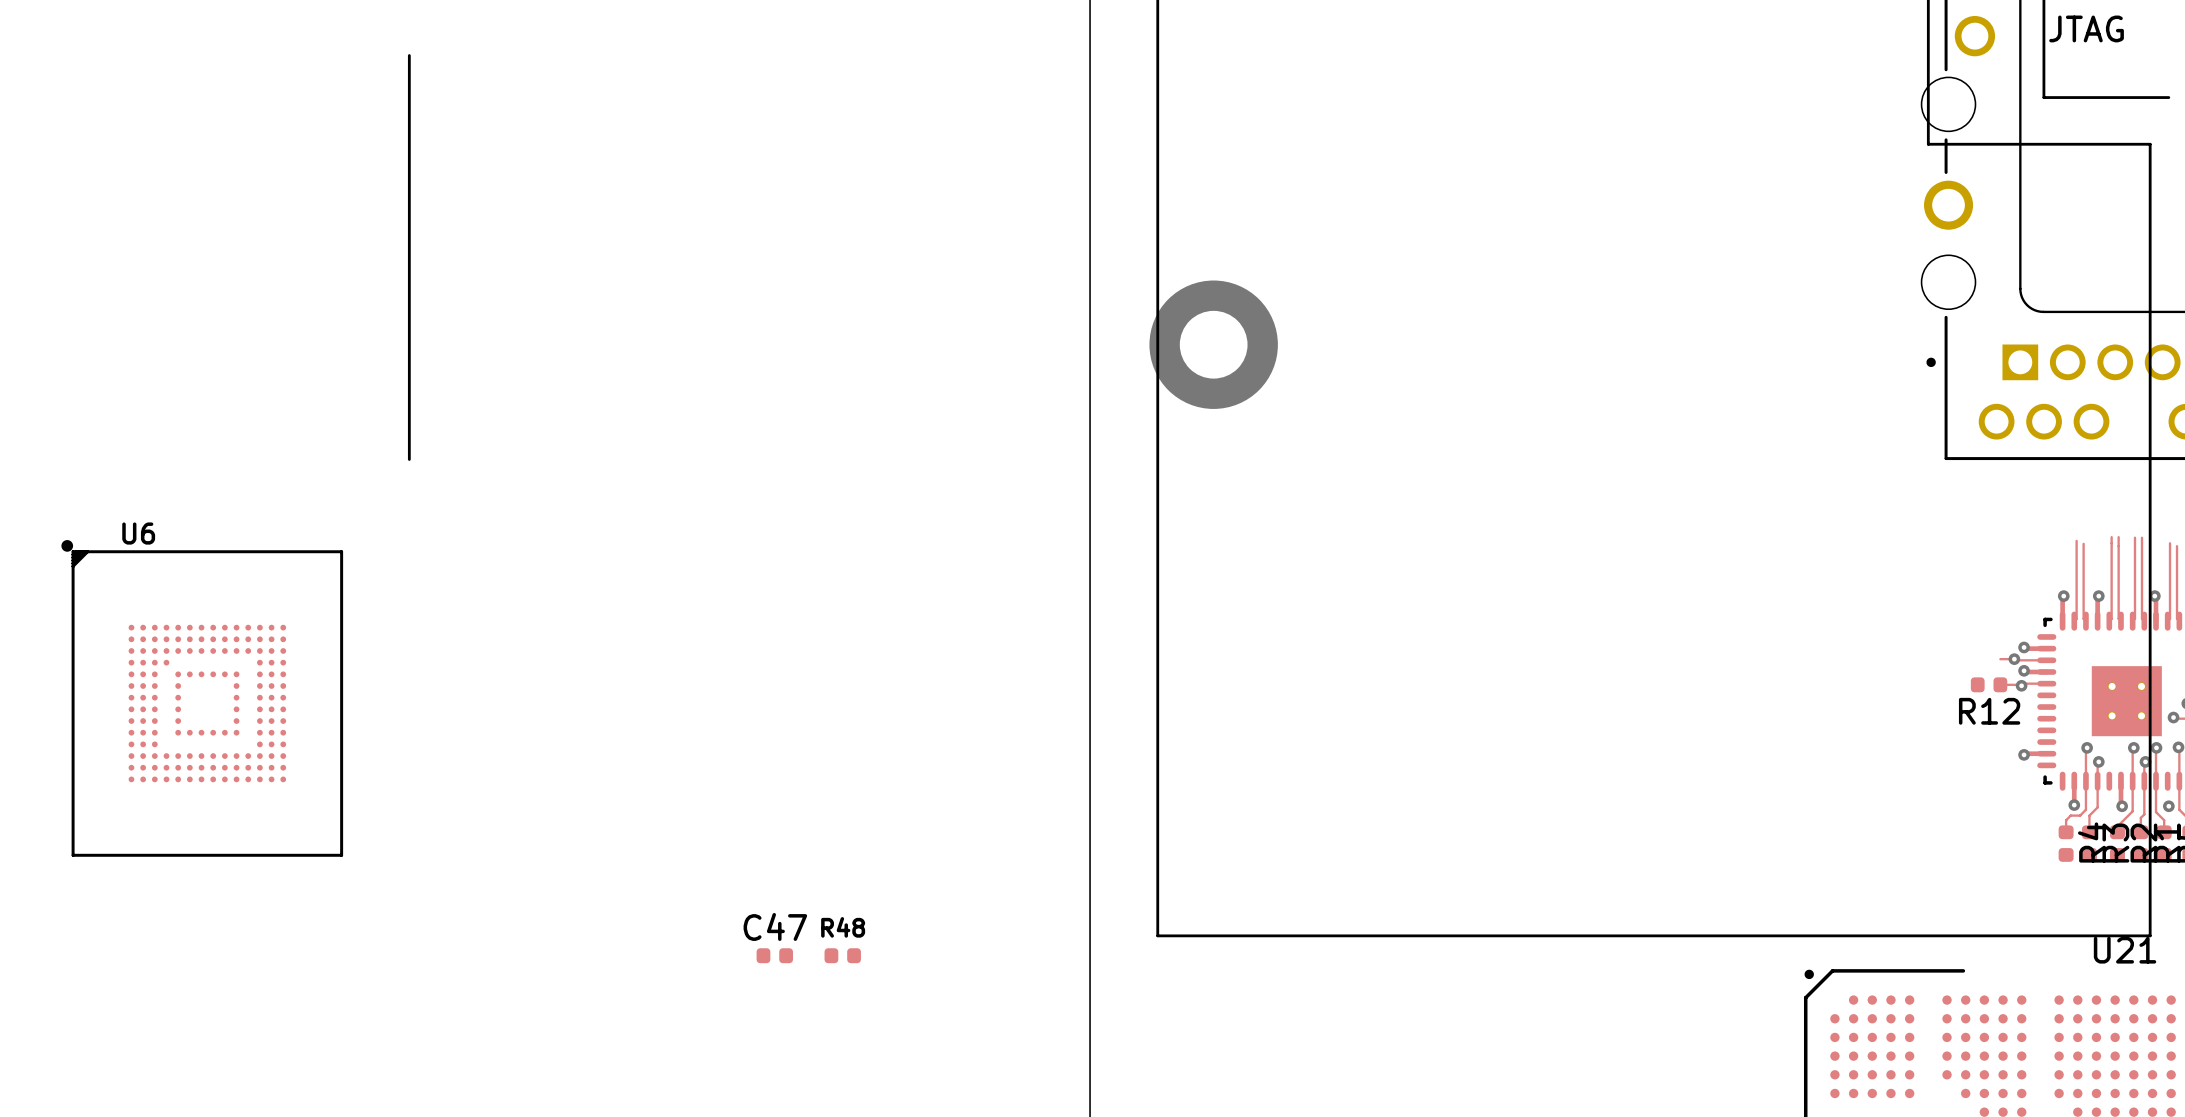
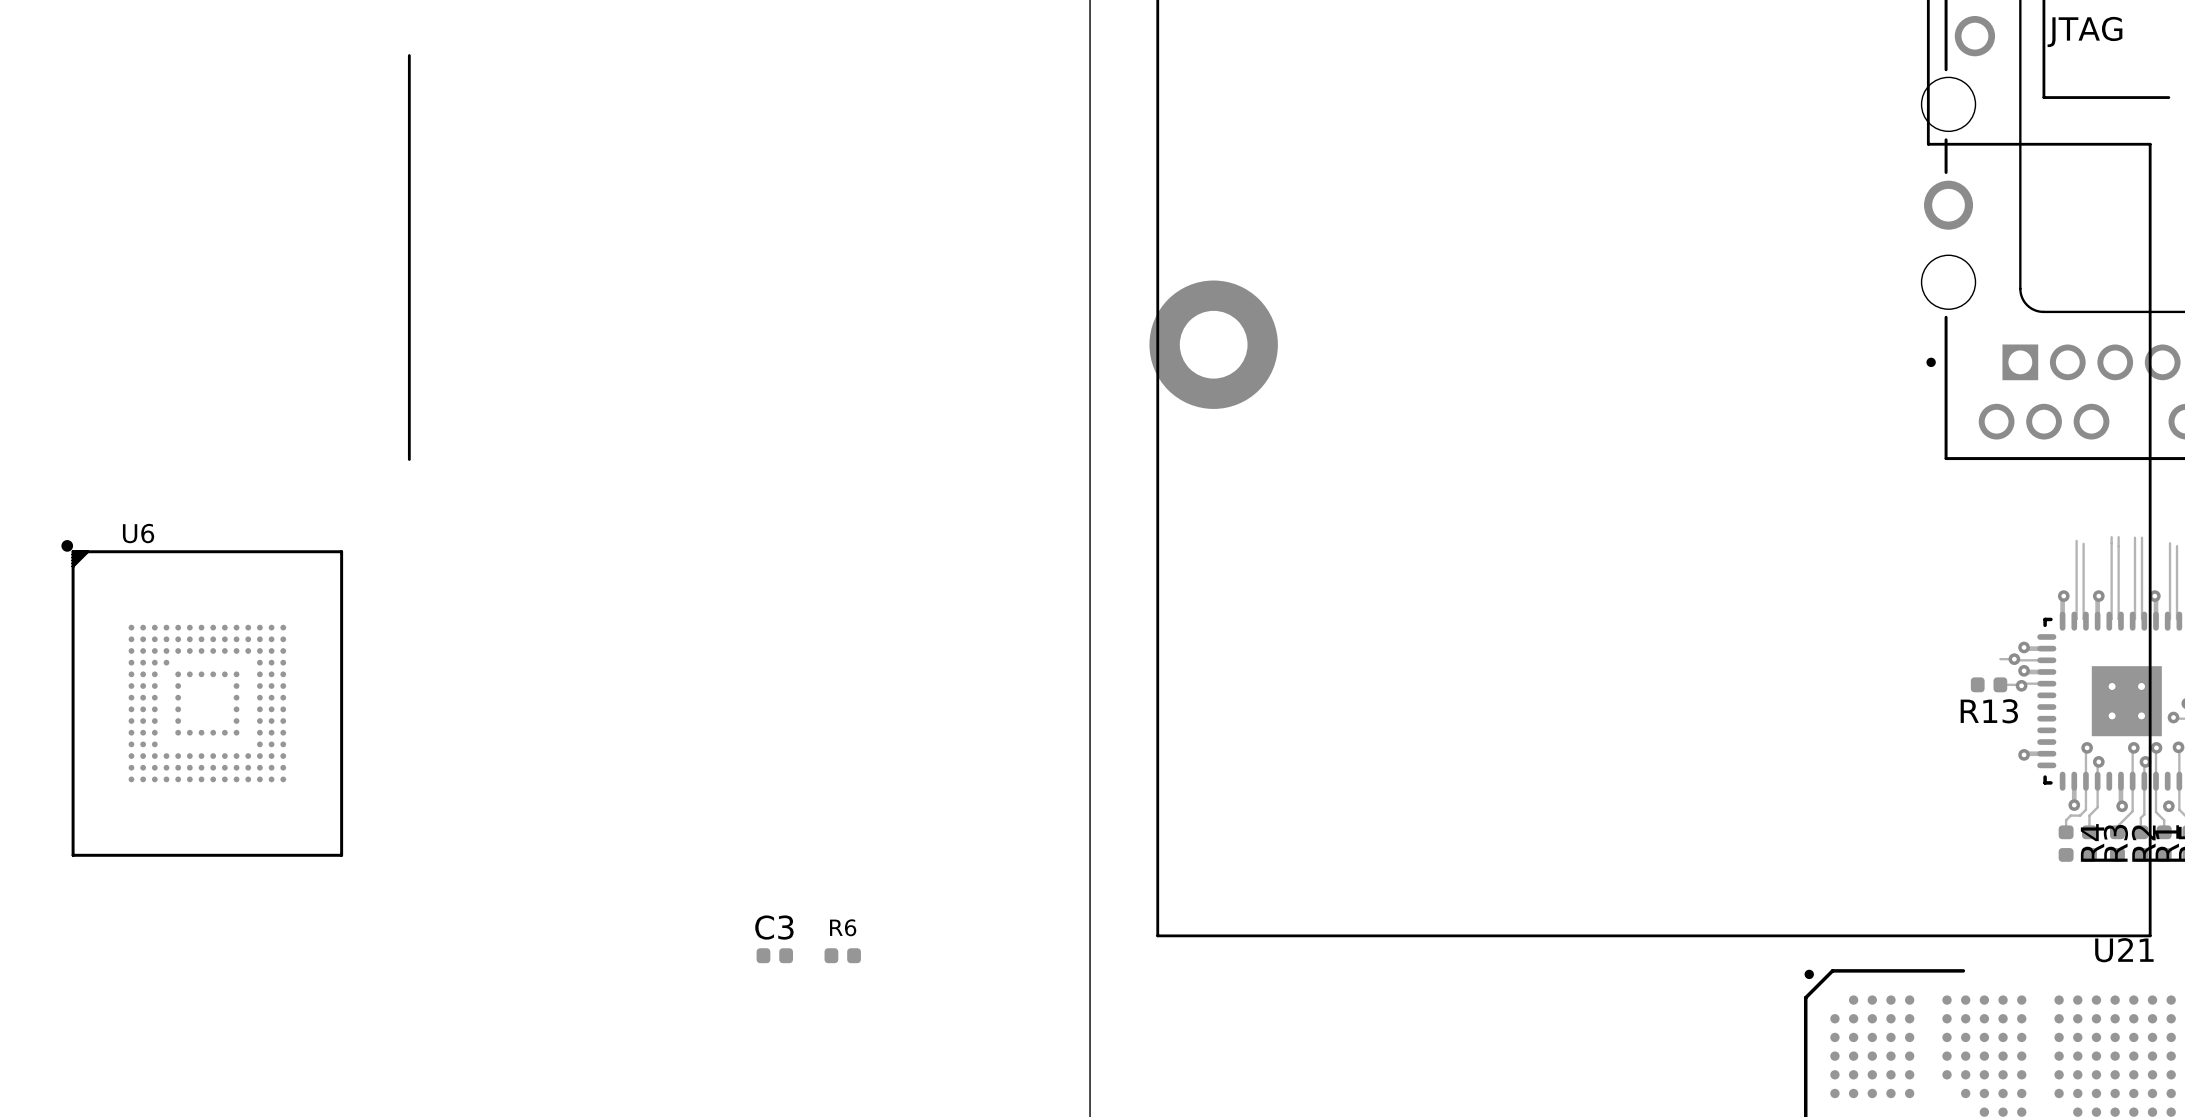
R12 name: R12 (1989, 711) -> R13 (1989, 711)
C47 name: C47 (775, 926) -> C3 (774, 927)
R48 name: R48 (843, 927) -> R6 (843, 927)

